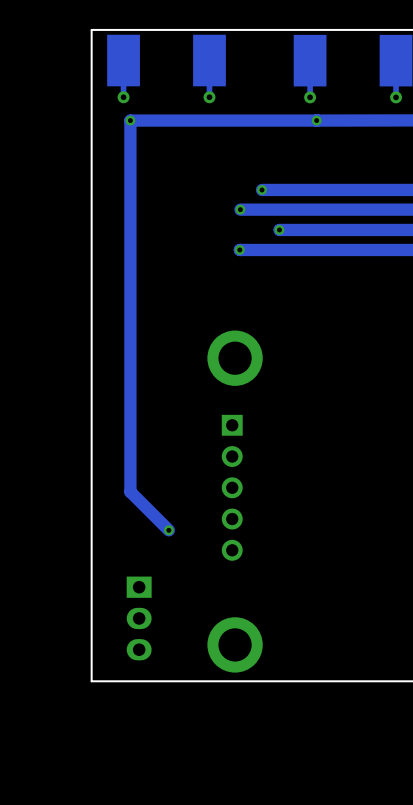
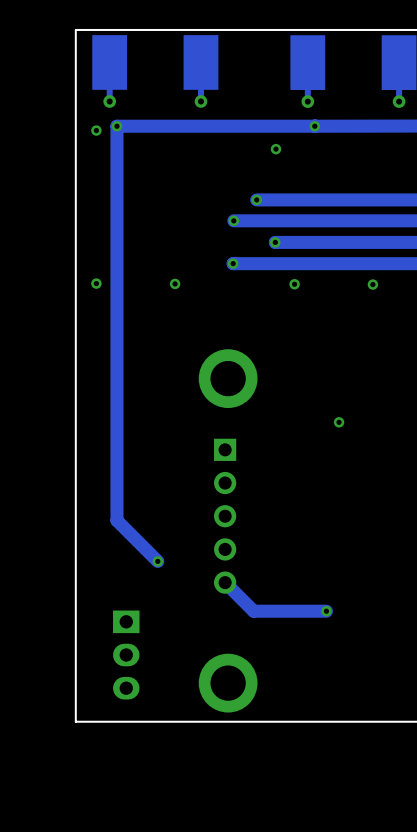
via: none -> (96, 130)
via: none -> (275, 149)
via: none -> (96, 283)
via: none -> (175, 283)
via: none -> (294, 284)
via: none -> (372, 284)
via: none -> (339, 422)
track: none -> (225, 582) (253, 611) (326, 611)
via: none -> (326, 611)

